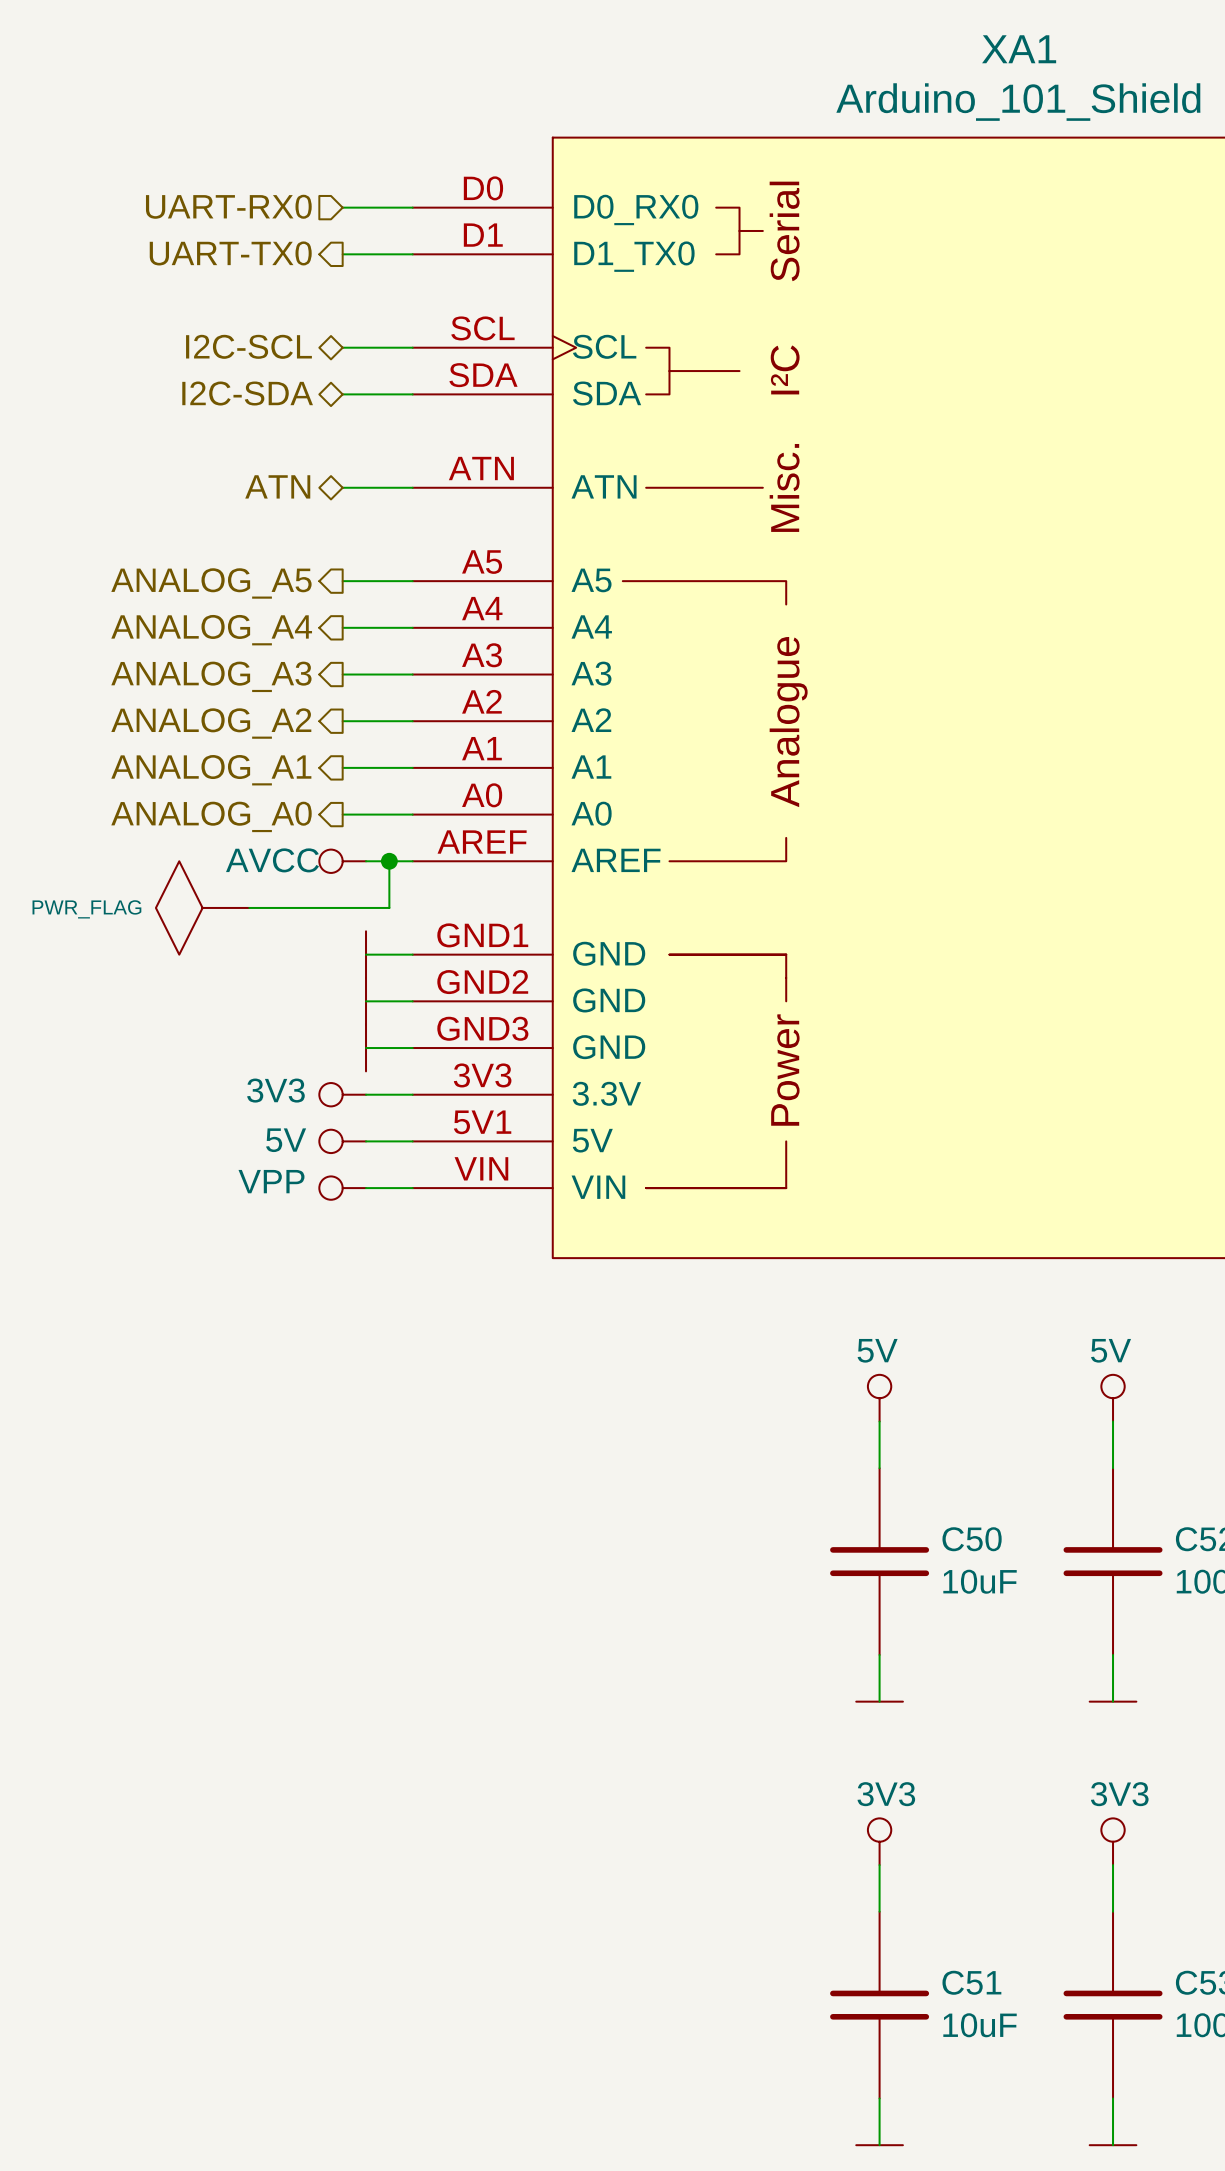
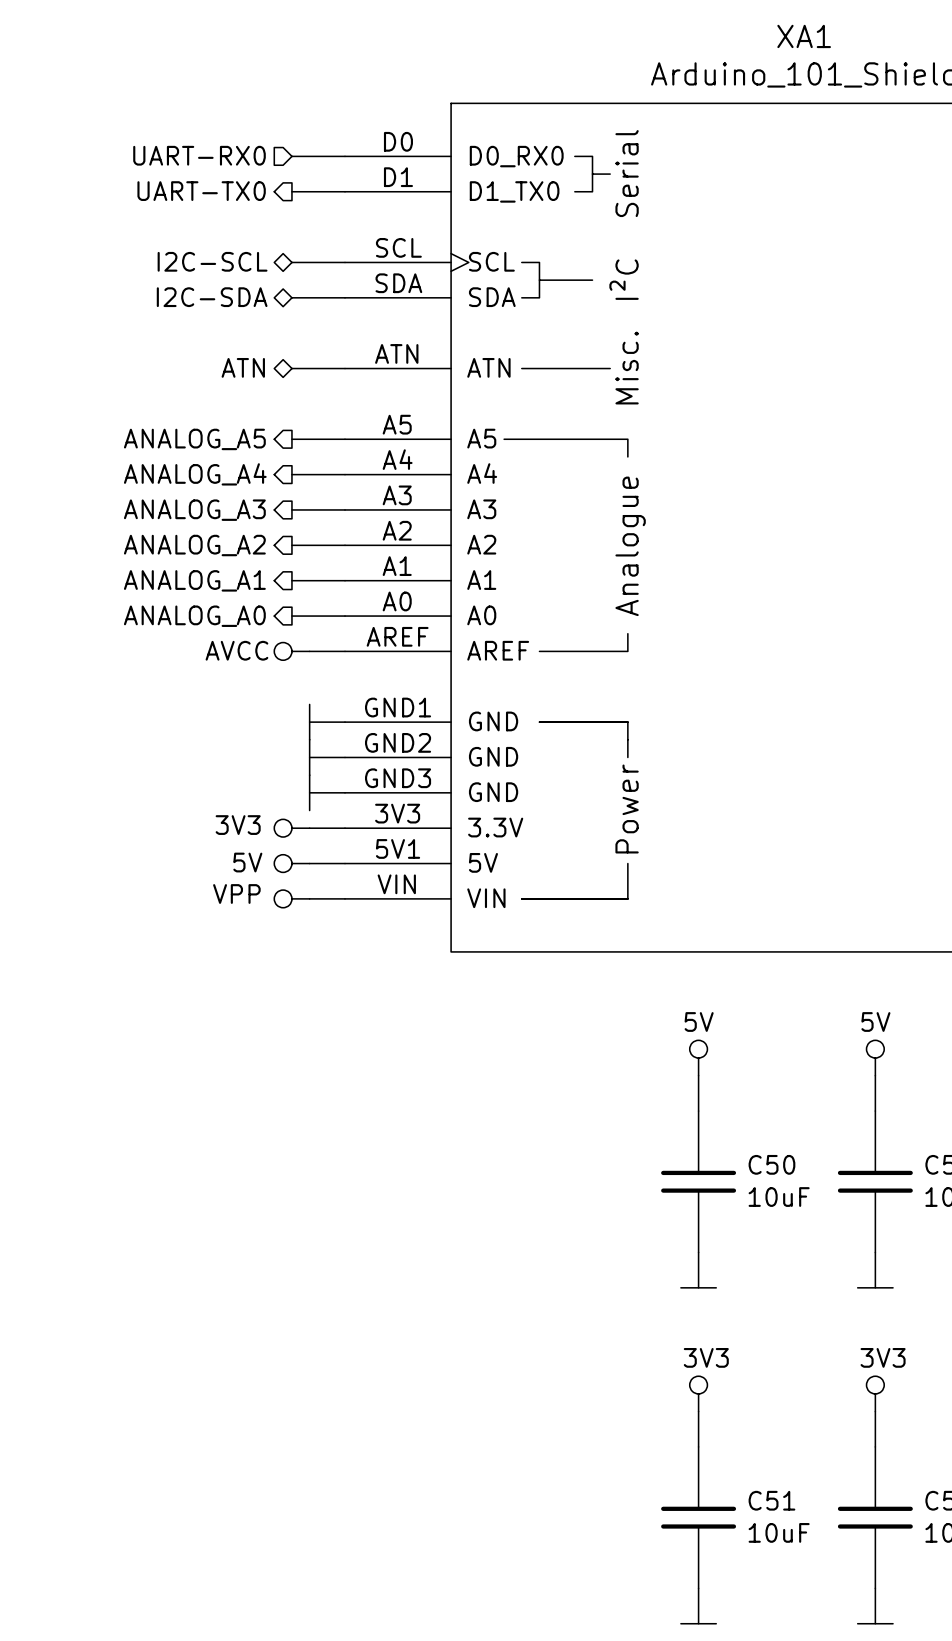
wire: (389, 861) (389, 907) (249, 907) -> none
junction: (389, 861) -> none
power symbol: PWR_FLAG (202, 907) -> none

